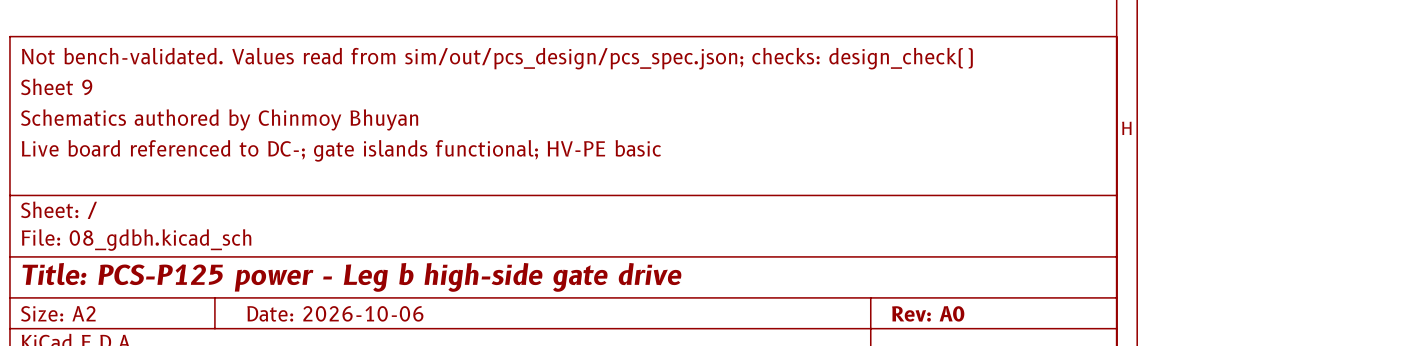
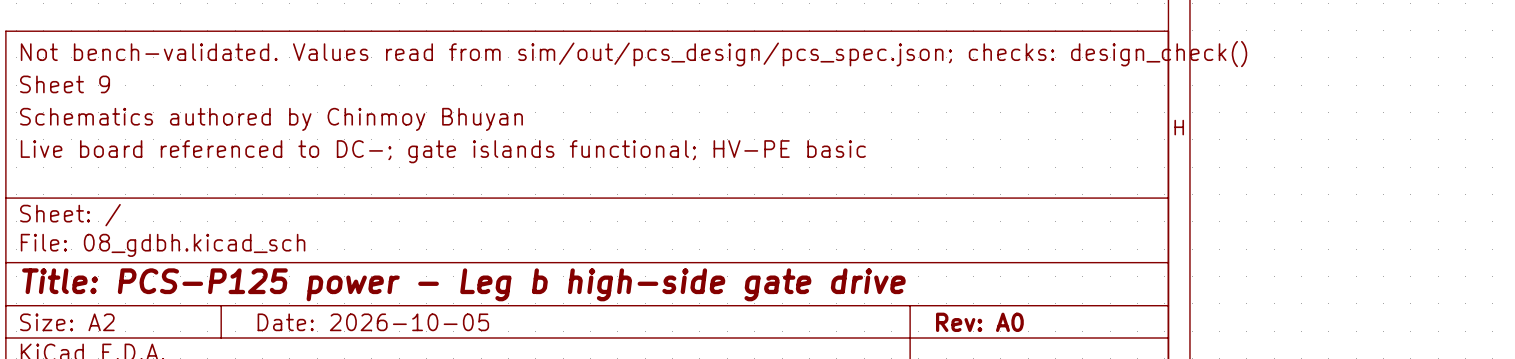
title block: Date: 2026-10-06 (335, 313) -> Date: 2026-10-05 (373, 322)

